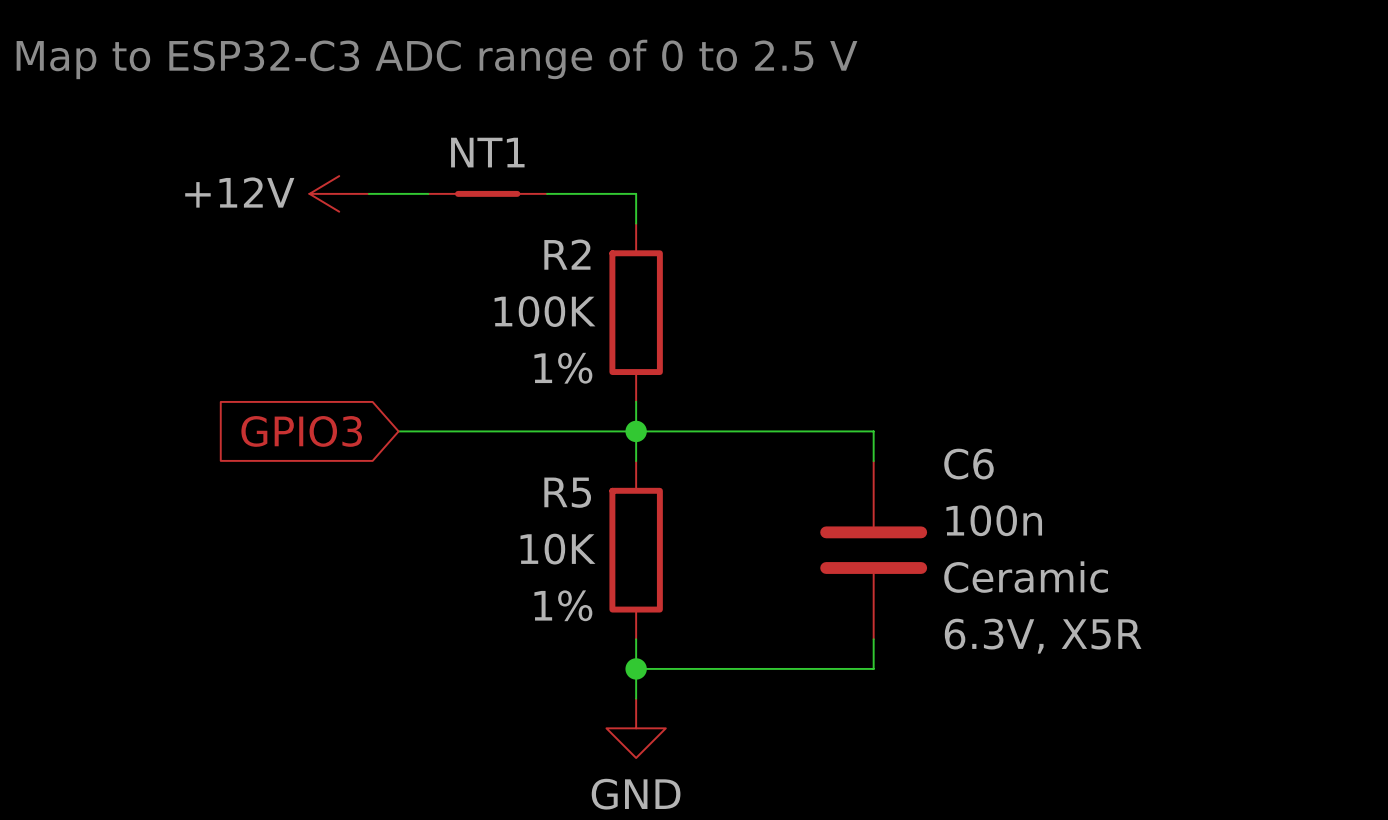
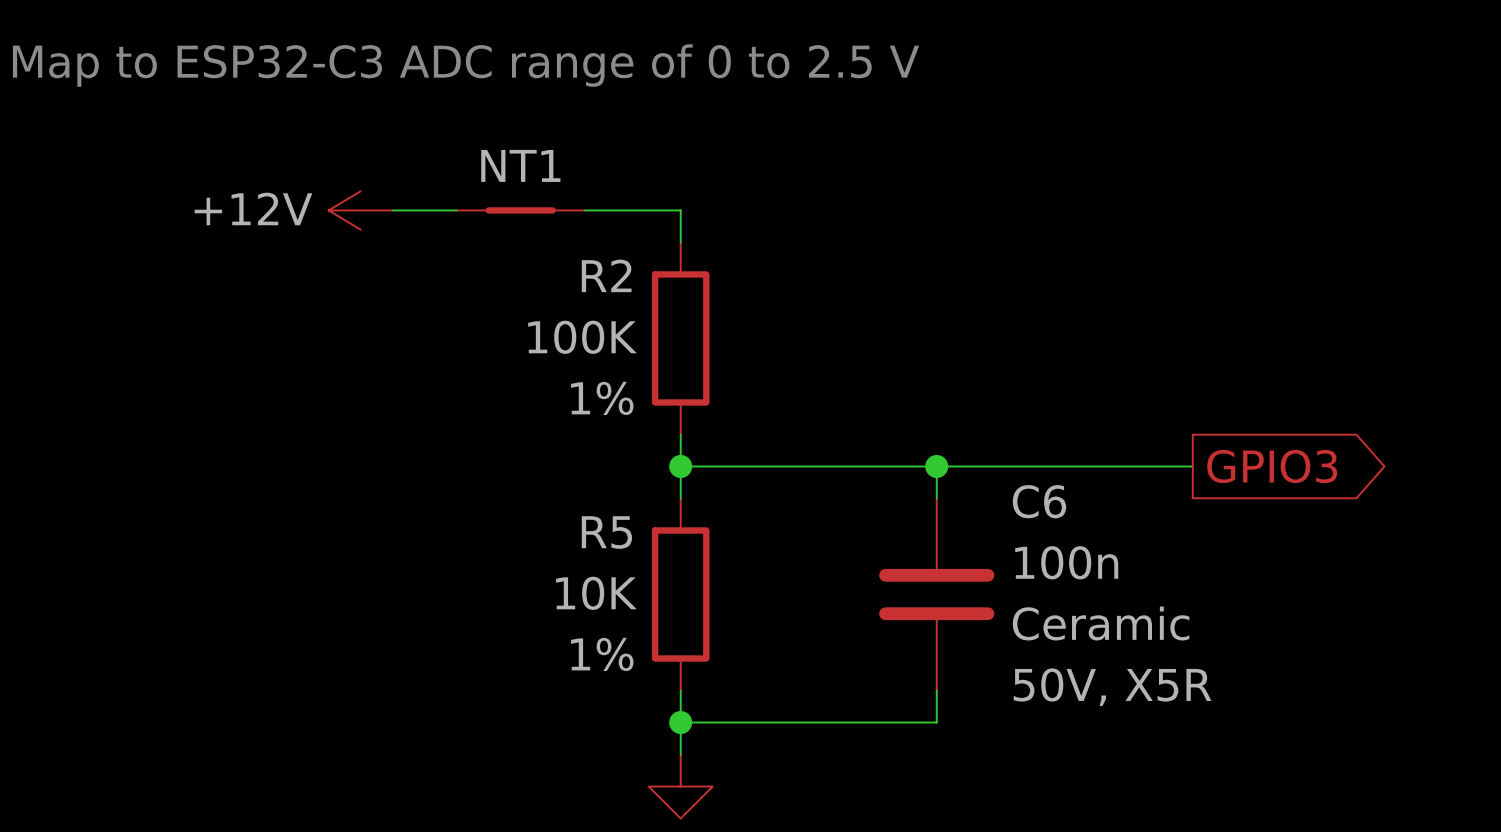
global label: GPIO3 (301, 431) -> none
wire: (398, 431) (636, 431) -> (936, 466) (1192, 466)
junction: none -> (936, 466)
global label: none -> GPIO3 (1272, 466)
C6 text: 6.3V, X5R (1043, 636) -> 50V, X5R (1112, 687)

